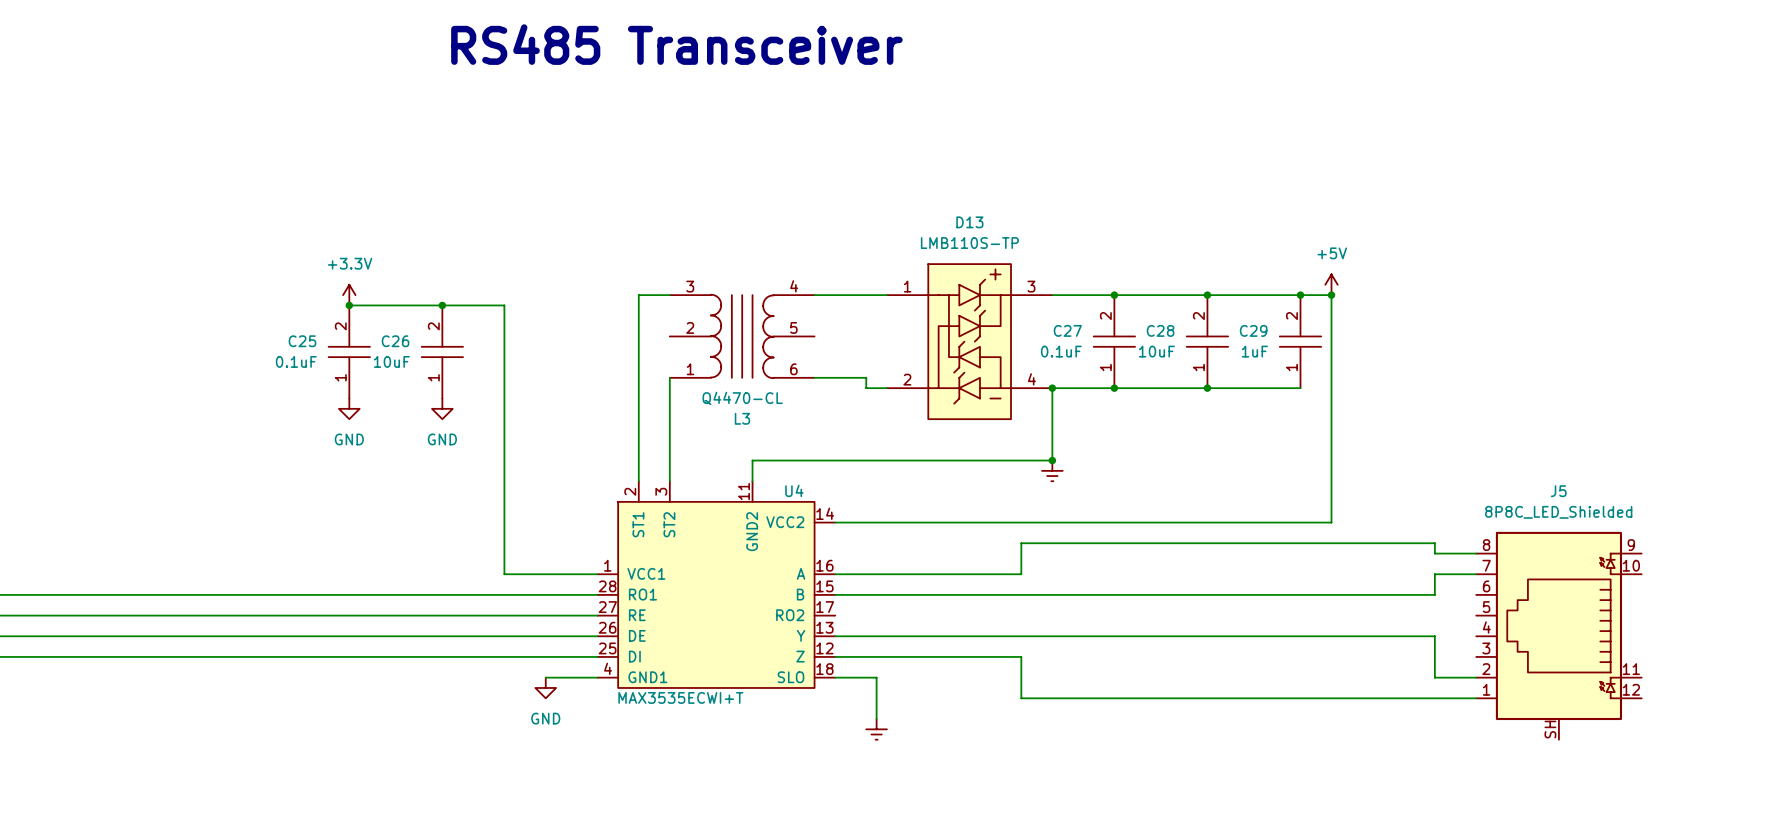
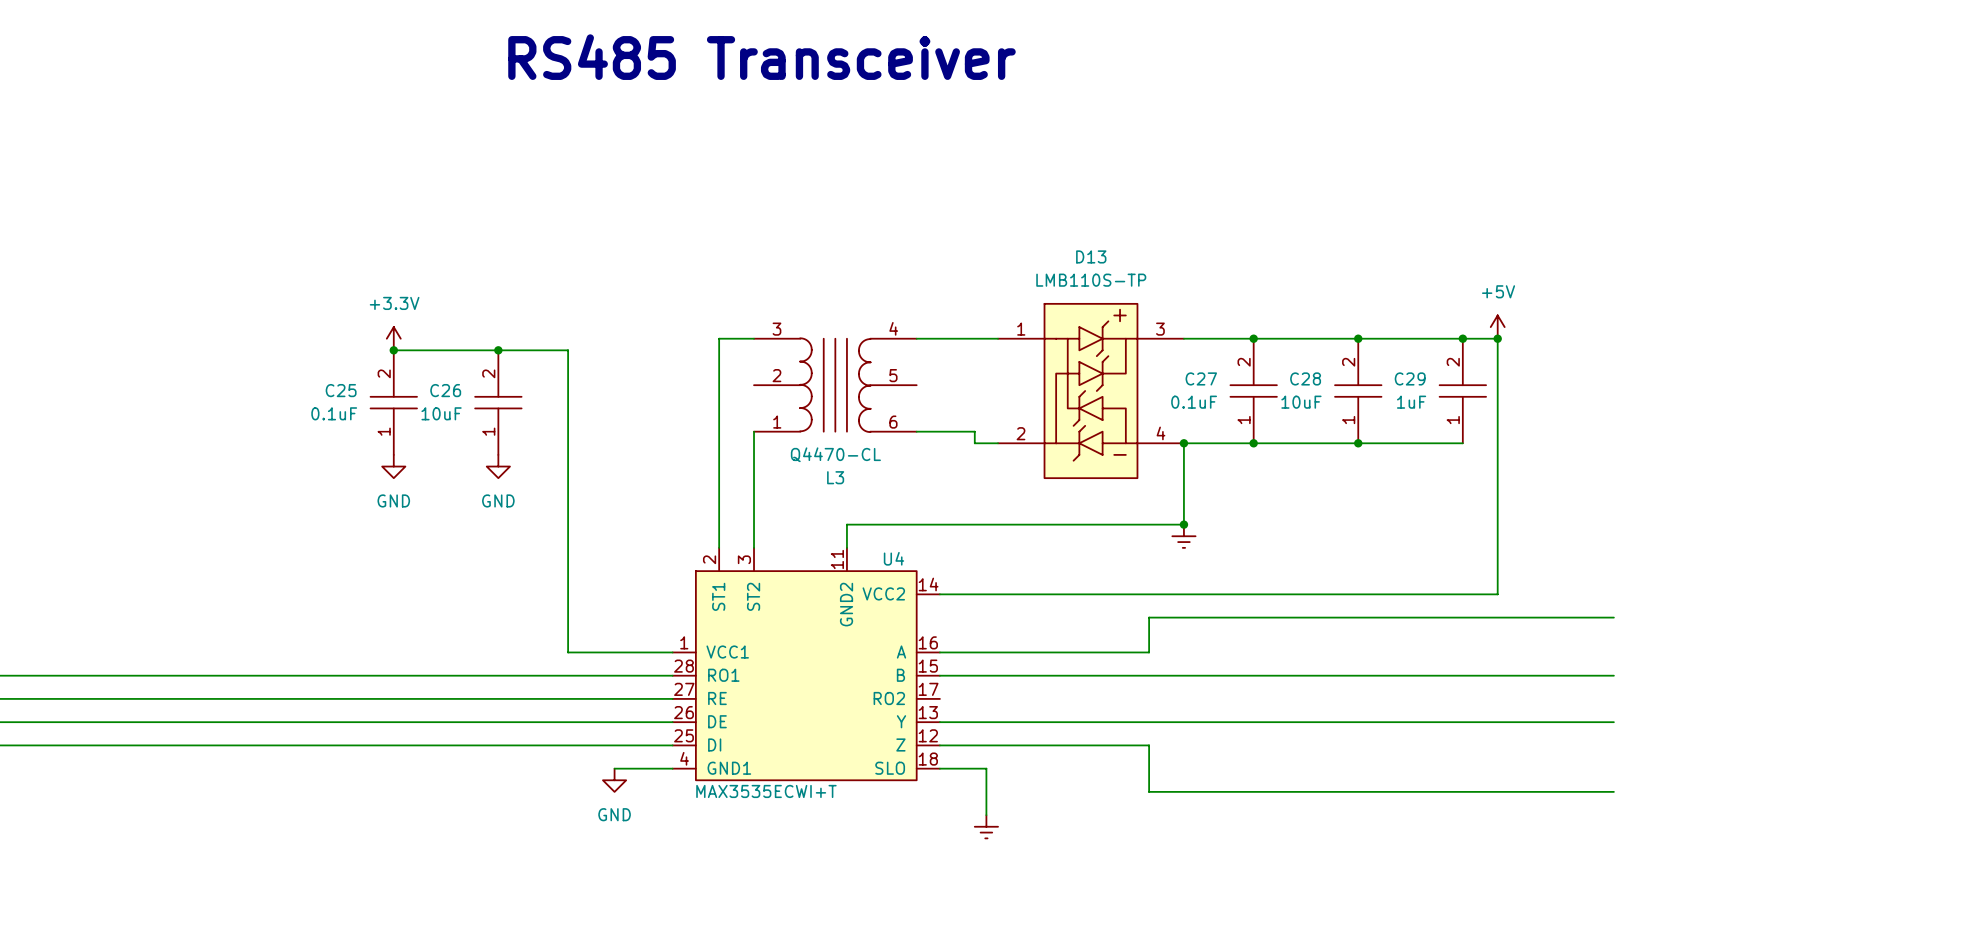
wire: (1434, 543) (1434, 553) (1476, 553) -> none
wire: (1476, 574) (1434, 574) (1434, 594) -> none
J5: 8P8C_LED_Shielded (1558, 635) -> none
wire: (1434, 636) (1434, 677) (1476, 677) -> none
wire: (1434, 698) (1476, 698) -> none

